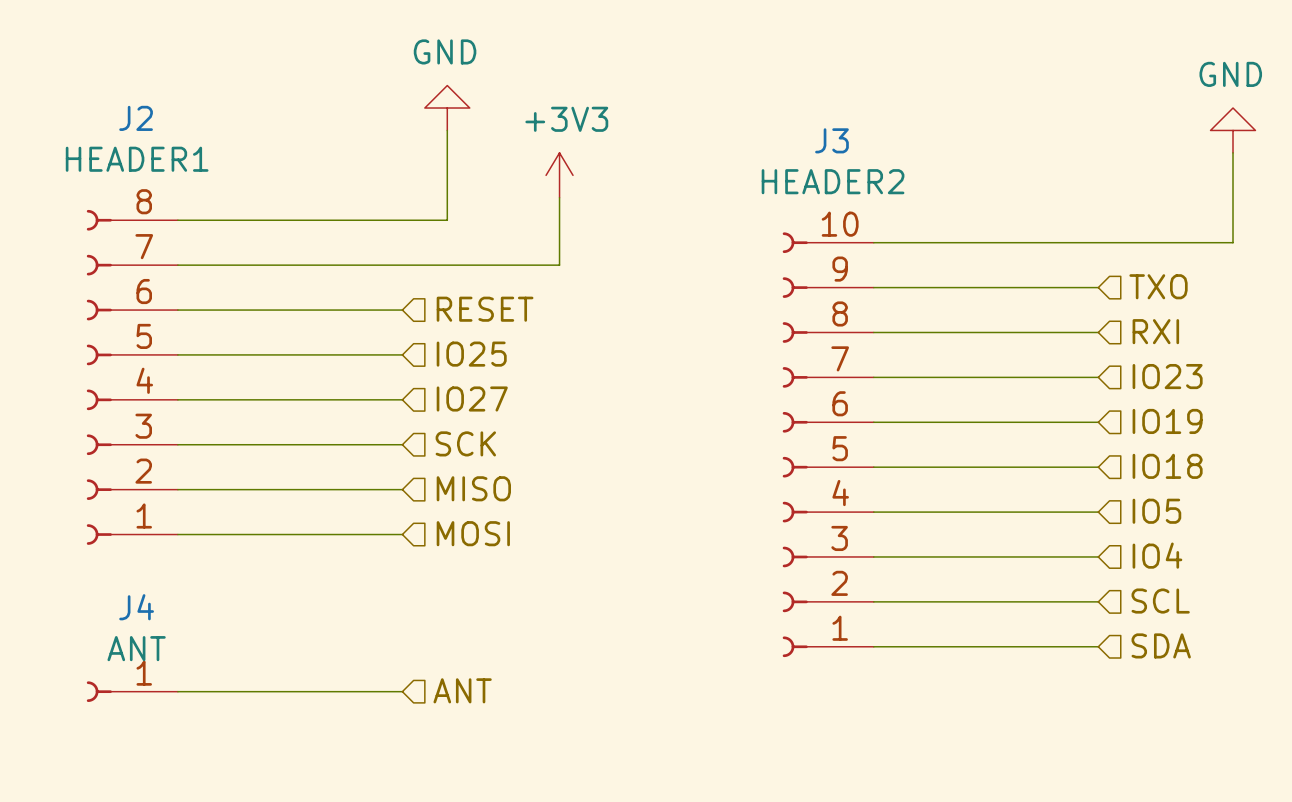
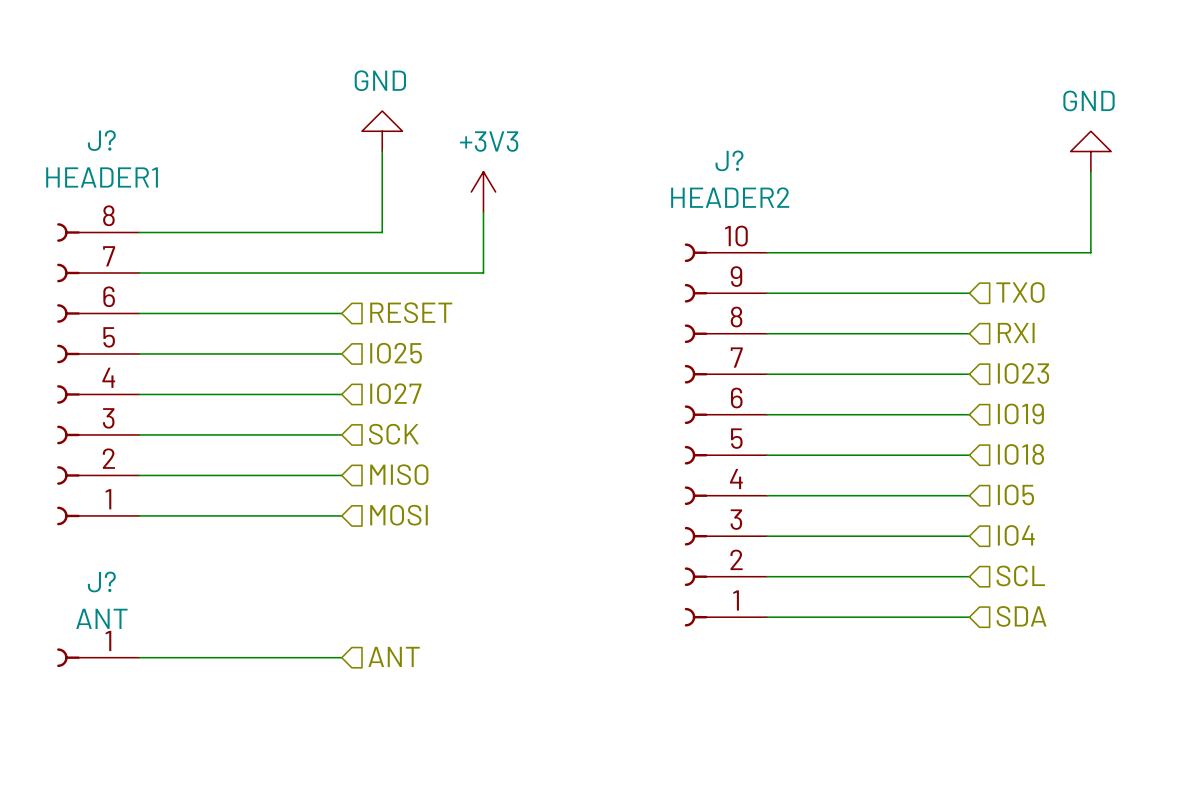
J2 name: J2 (136, 118) -> J? (101, 140)
J3 name: J3 (831, 140) -> J? (729, 160)
J4 name: J4 (136, 607) -> J? (101, 581)

